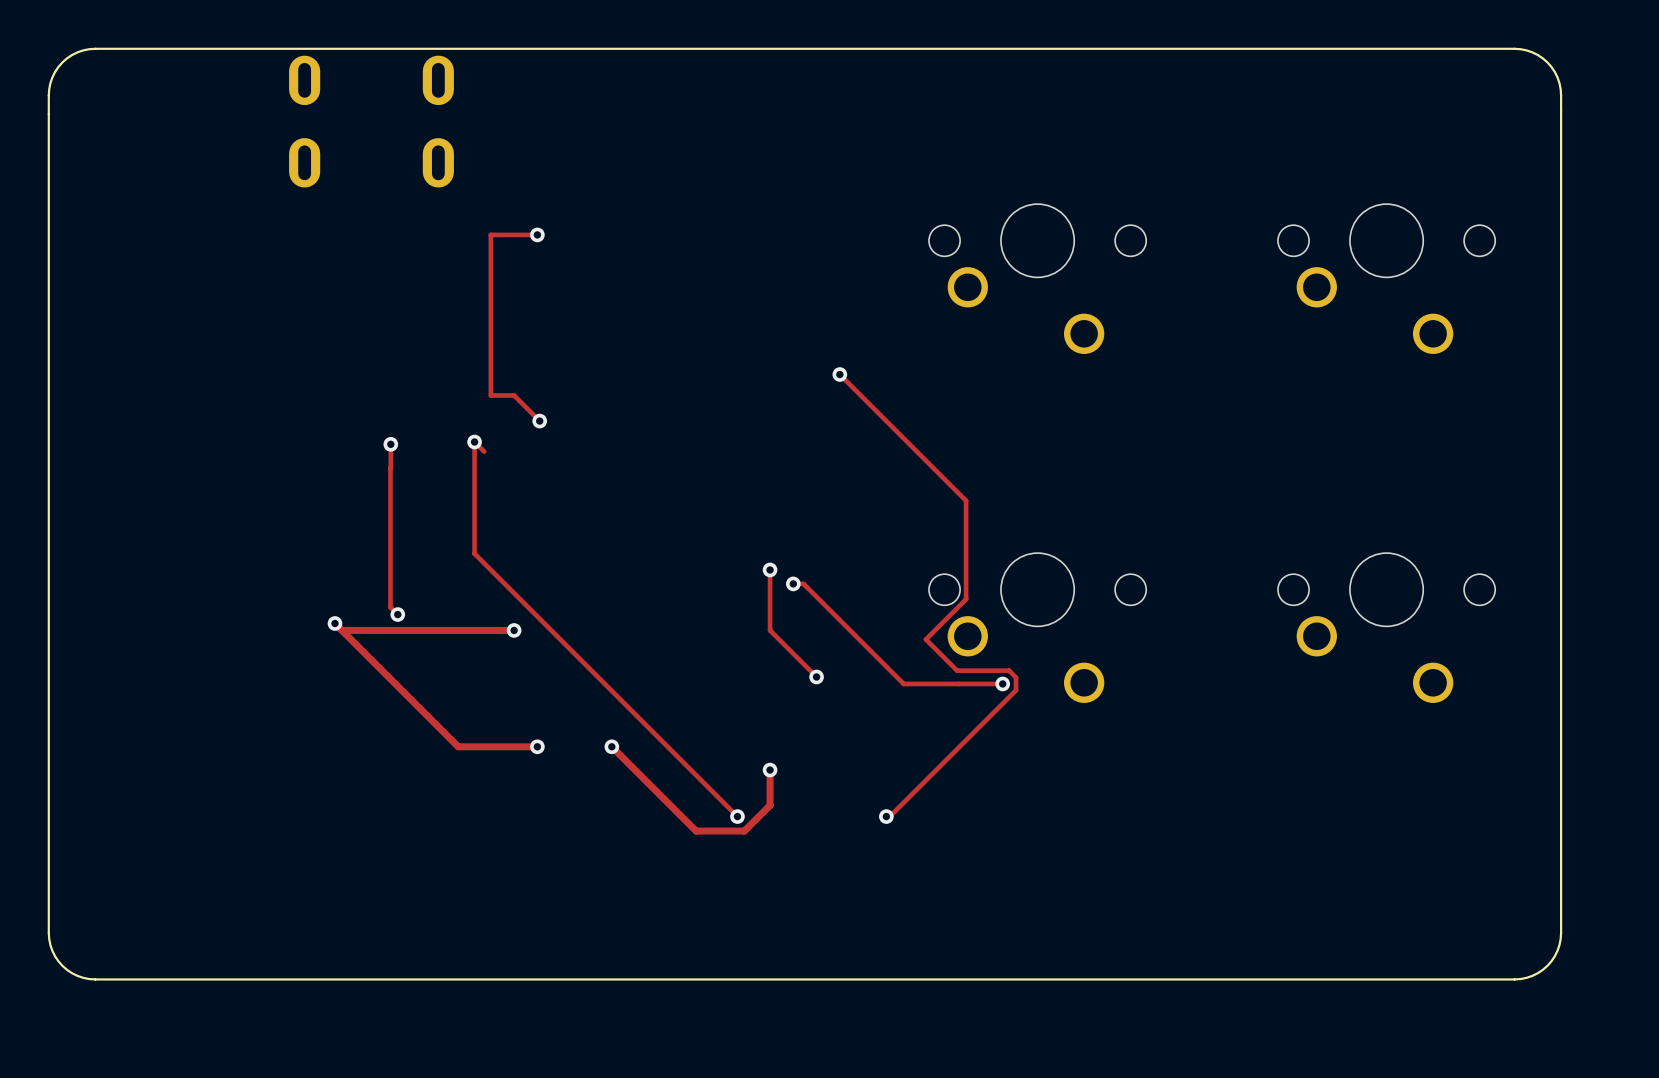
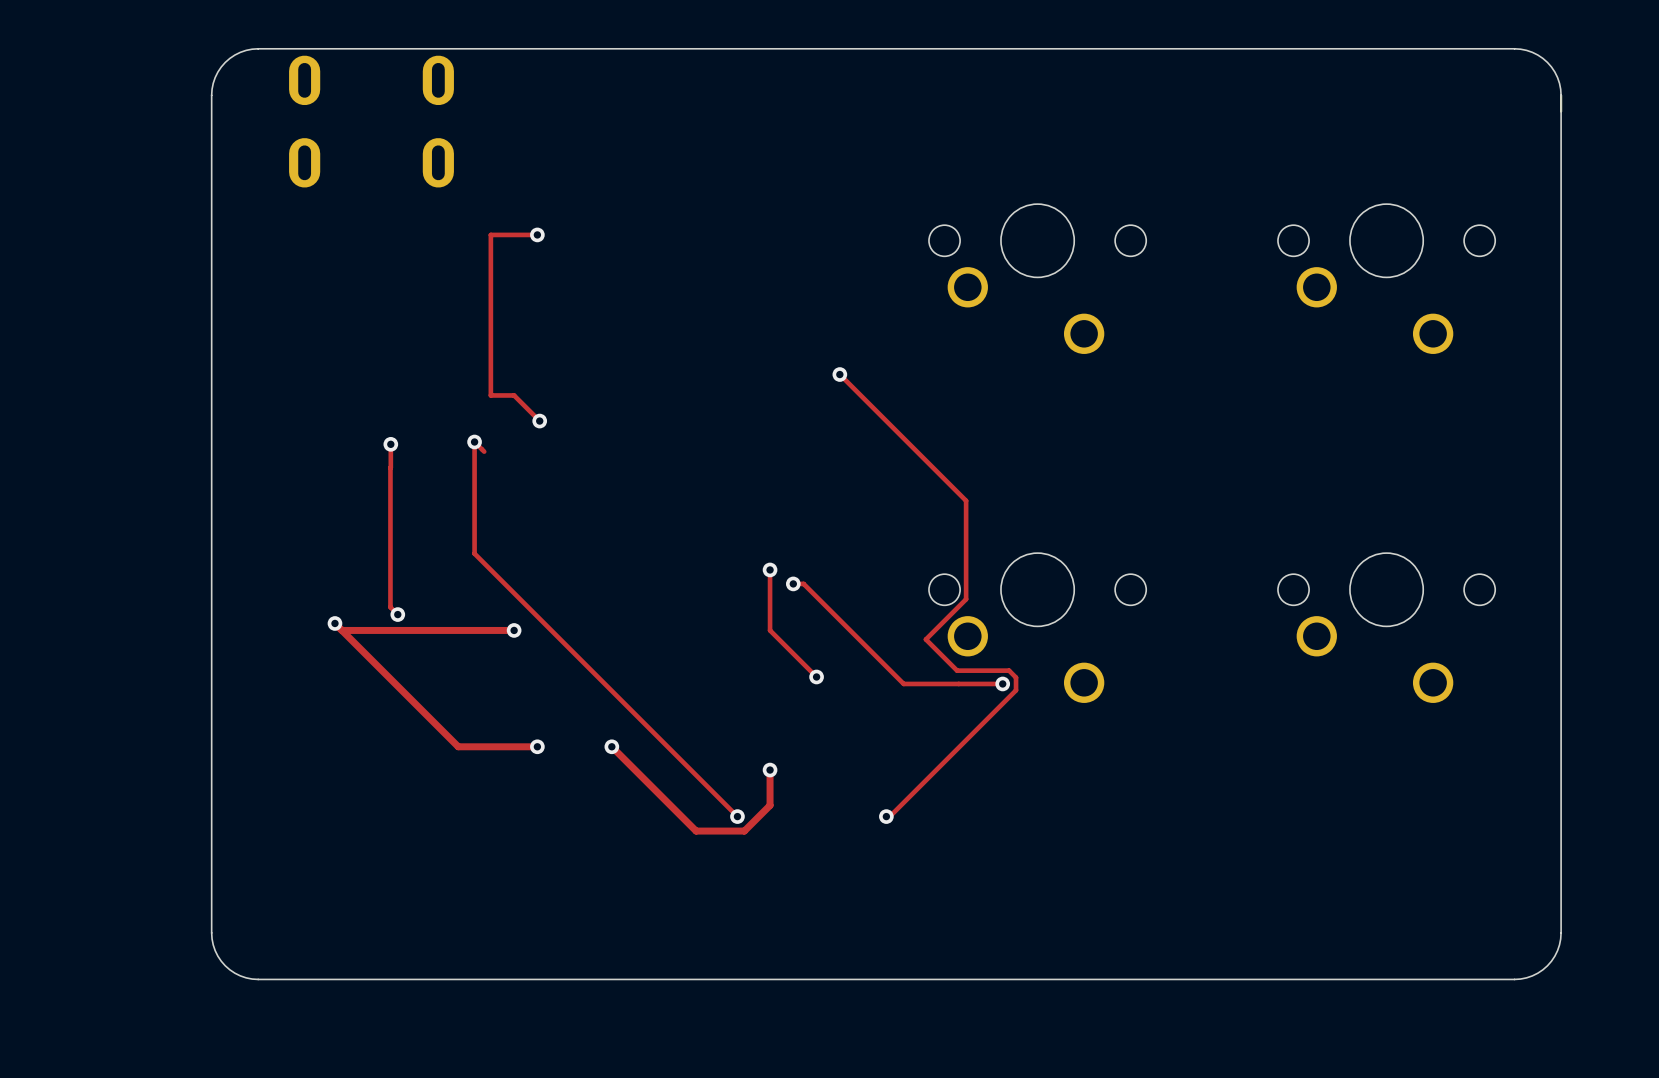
board edge: none -> (258, 48) (1514, 48) (1526, 50) (1542, 58) (1554, 72) (1559, 83) (1561, 95) (1561, 932) (1559, 944) (1551, 961) (1542, 969) (1532, 975) (1514, 979) (258, 979) (246, 977) (229, 969) (221, 961) (215, 950) (211, 932) (211, 95) (215, 77) (225, 62) (240, 52) (258, 48)
line: (1561, 95) (1557, 77) (1547, 62) (1532, 52) (1514, 48) (95, 48) (83, 50) (72, 55) (62, 62) (55, 72) (50, 83) (48, 95) (48, 932) (50, 944) (55, 956) (62, 965) (72, 973) (83, 977) (95, 979) (1514, 979) (1526, 977) (1537, 973) (1547, 965) (1554, 956) (1559, 944) (1561, 932) (1561, 111) -> none

